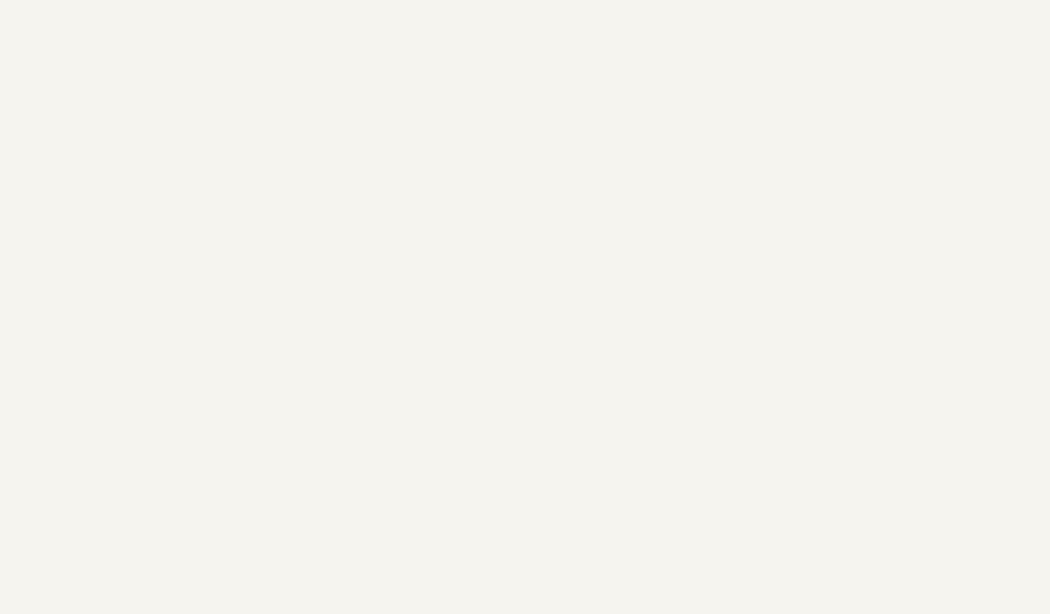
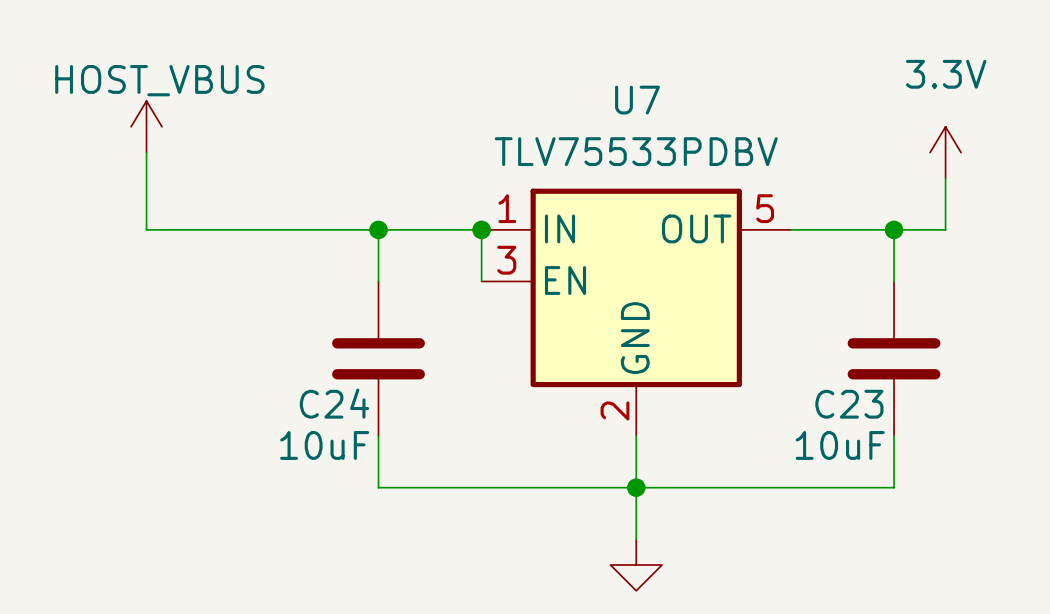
power symbol: none -> HOST_VBUS (146, 126)
wire: none -> (146, 152) (146, 229) (481, 229) (481, 281)
power symbol: none -> 3.3V (945, 152)
wire: none -> (945, 178) (945, 229) (790, 229)
wire: none -> (378, 229) (378, 281)
junction: none -> (378, 229)
junction: none -> (481, 229)
wire: none -> (894, 229) (894, 281)
junction: none -> (894, 229)
U7: none -> TLV75533PDBV (636, 312)
C24: none -> 10uF (378, 358)
C23: none -> 10uF (894, 358)
wire: none -> (378, 436) (378, 487) (894, 487) (894, 436)
wire: none -> (636, 436) (636, 539)
junction: none -> (636, 487)
power symbol: none -> (636, 564)

